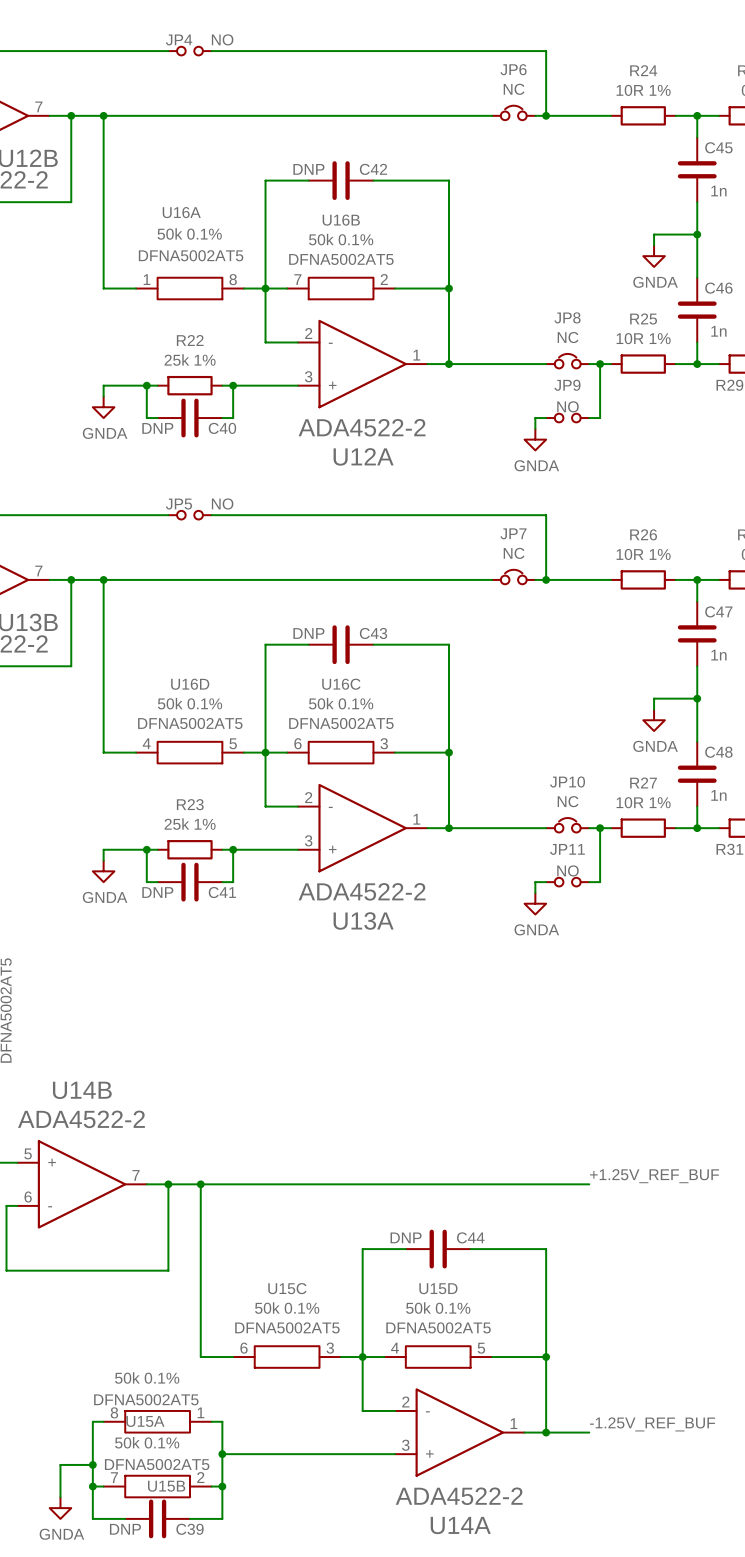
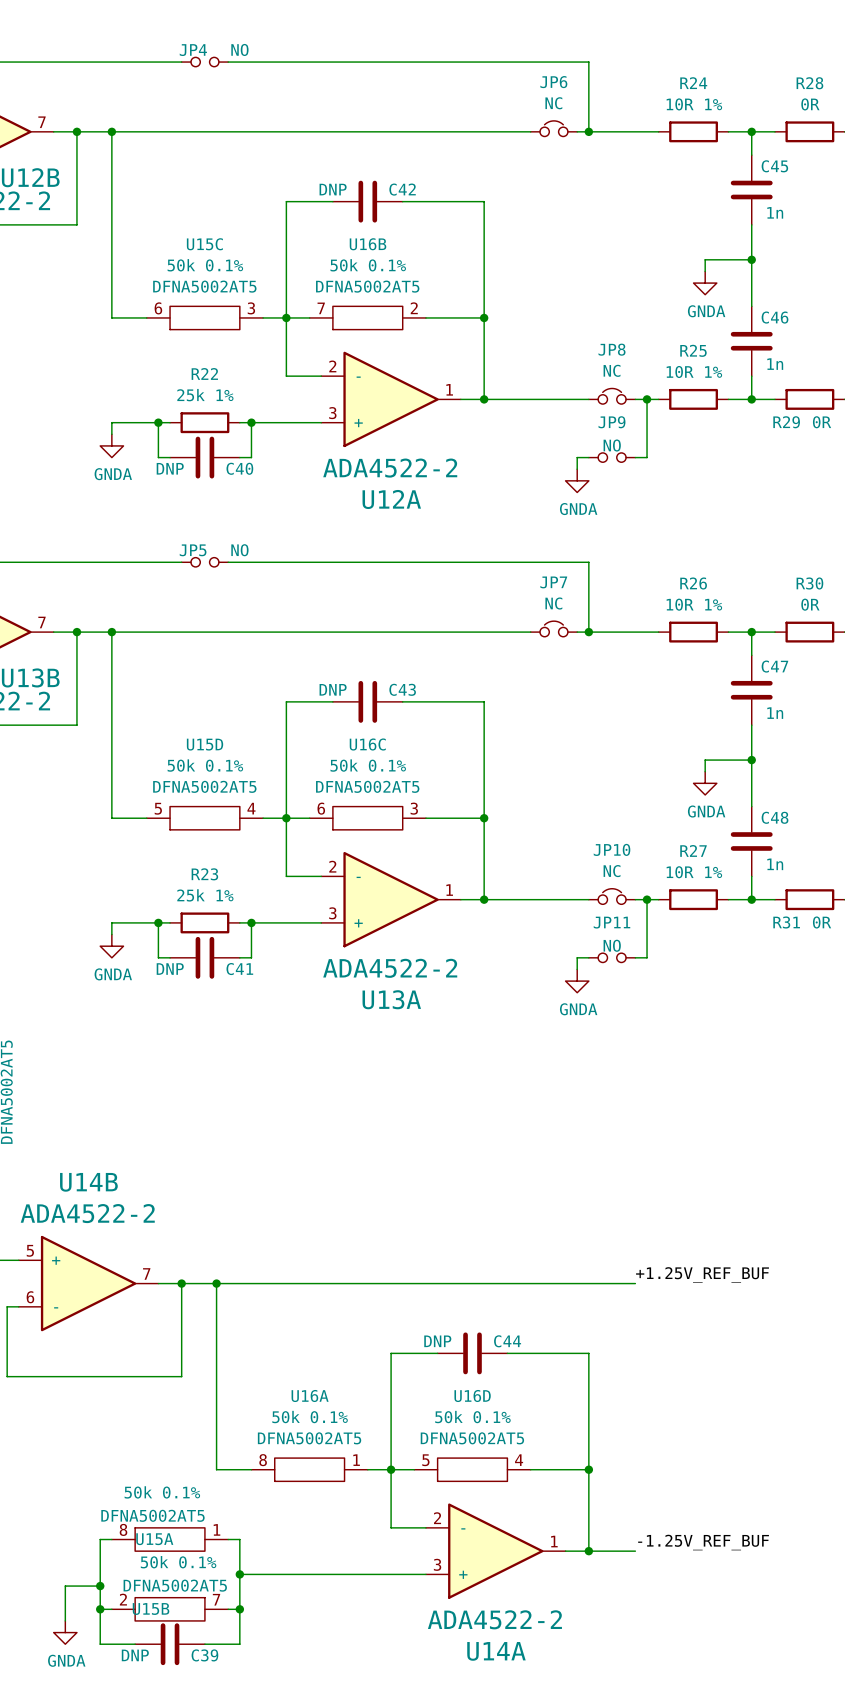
U16A rotation: 0° (189, 288) -> 180° (309, 1469)
U16A position: (189, 288) -> (309, 1469)
U16D rotation: 0° (189, 752) -> 180° (472, 1469)
U16D position: (189, 752) -> (472, 1469)
U15C position: (287, 1357) -> (204, 317)
U15D rotation: 0° (438, 1357) -> 180° (204, 818)
U15D position: (438, 1357) -> (204, 818)
U15B rotation: 0° (157, 1486) -> 180° (170, 1609)

